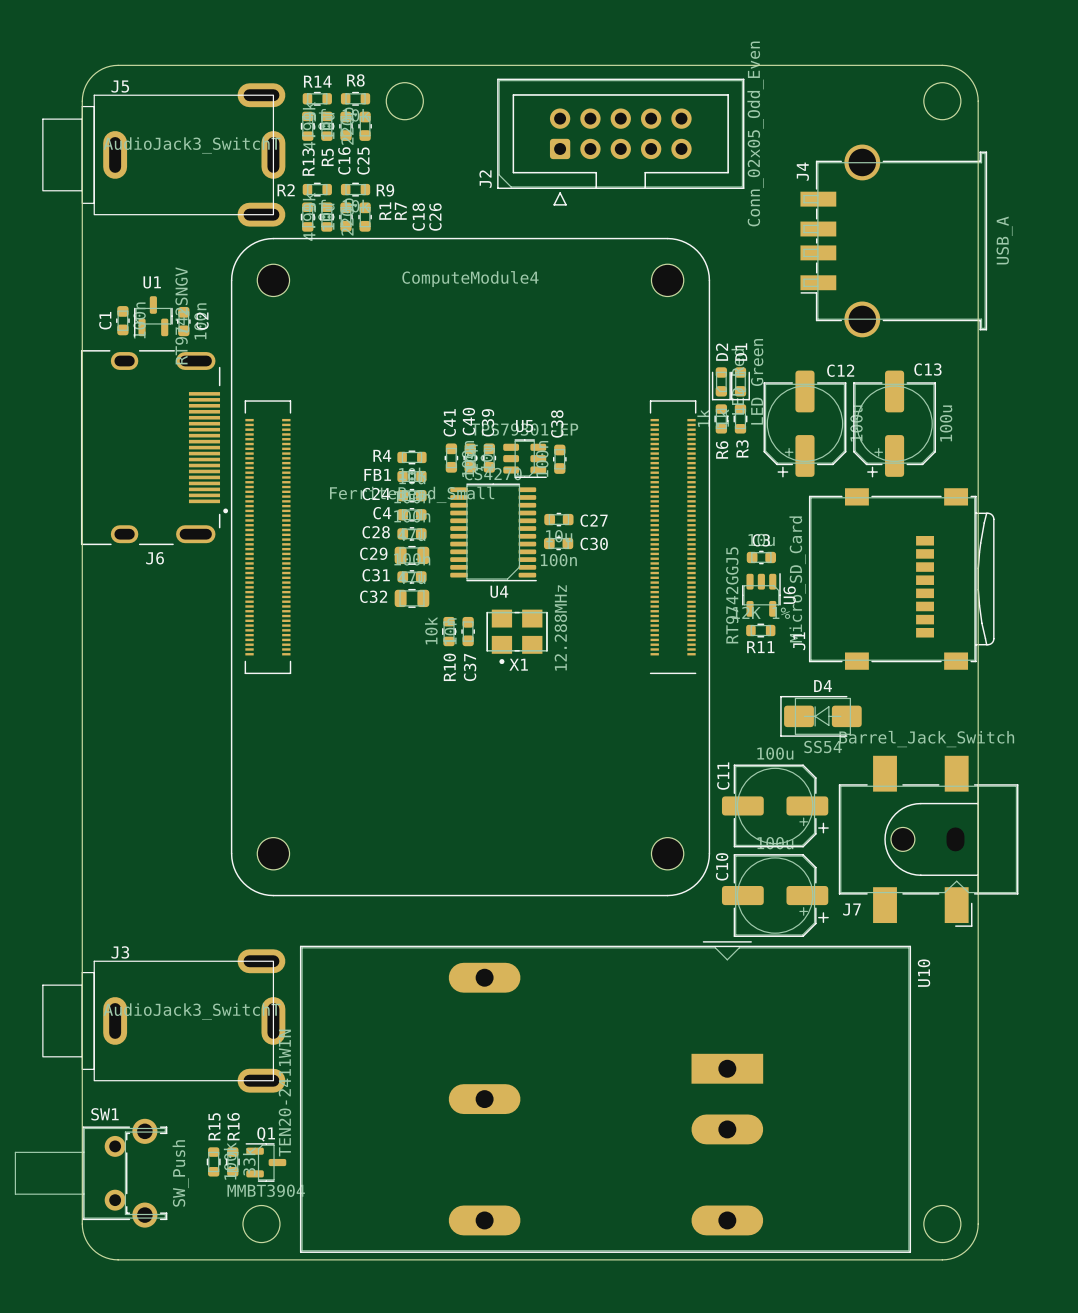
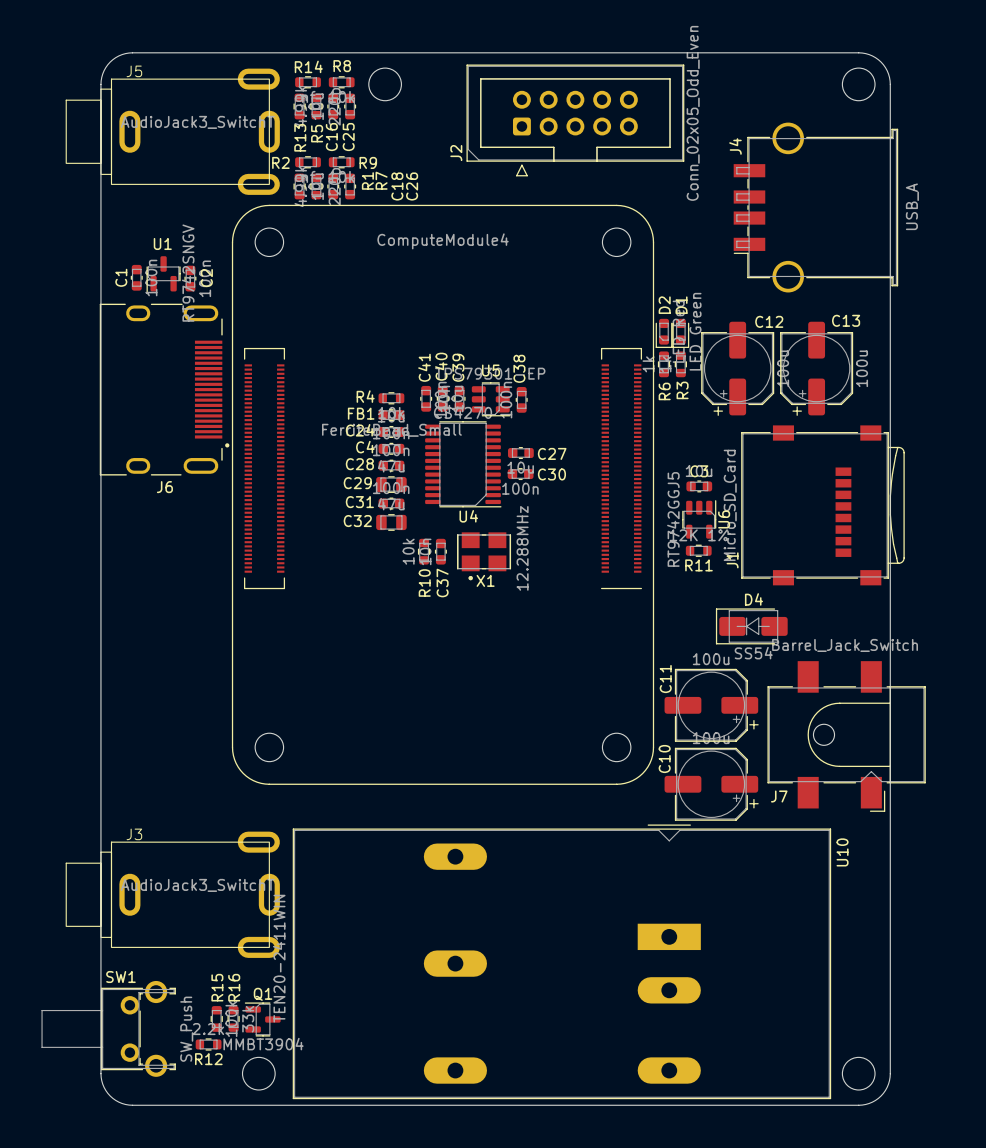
R12: none -> 2.2k (208, 1044)

